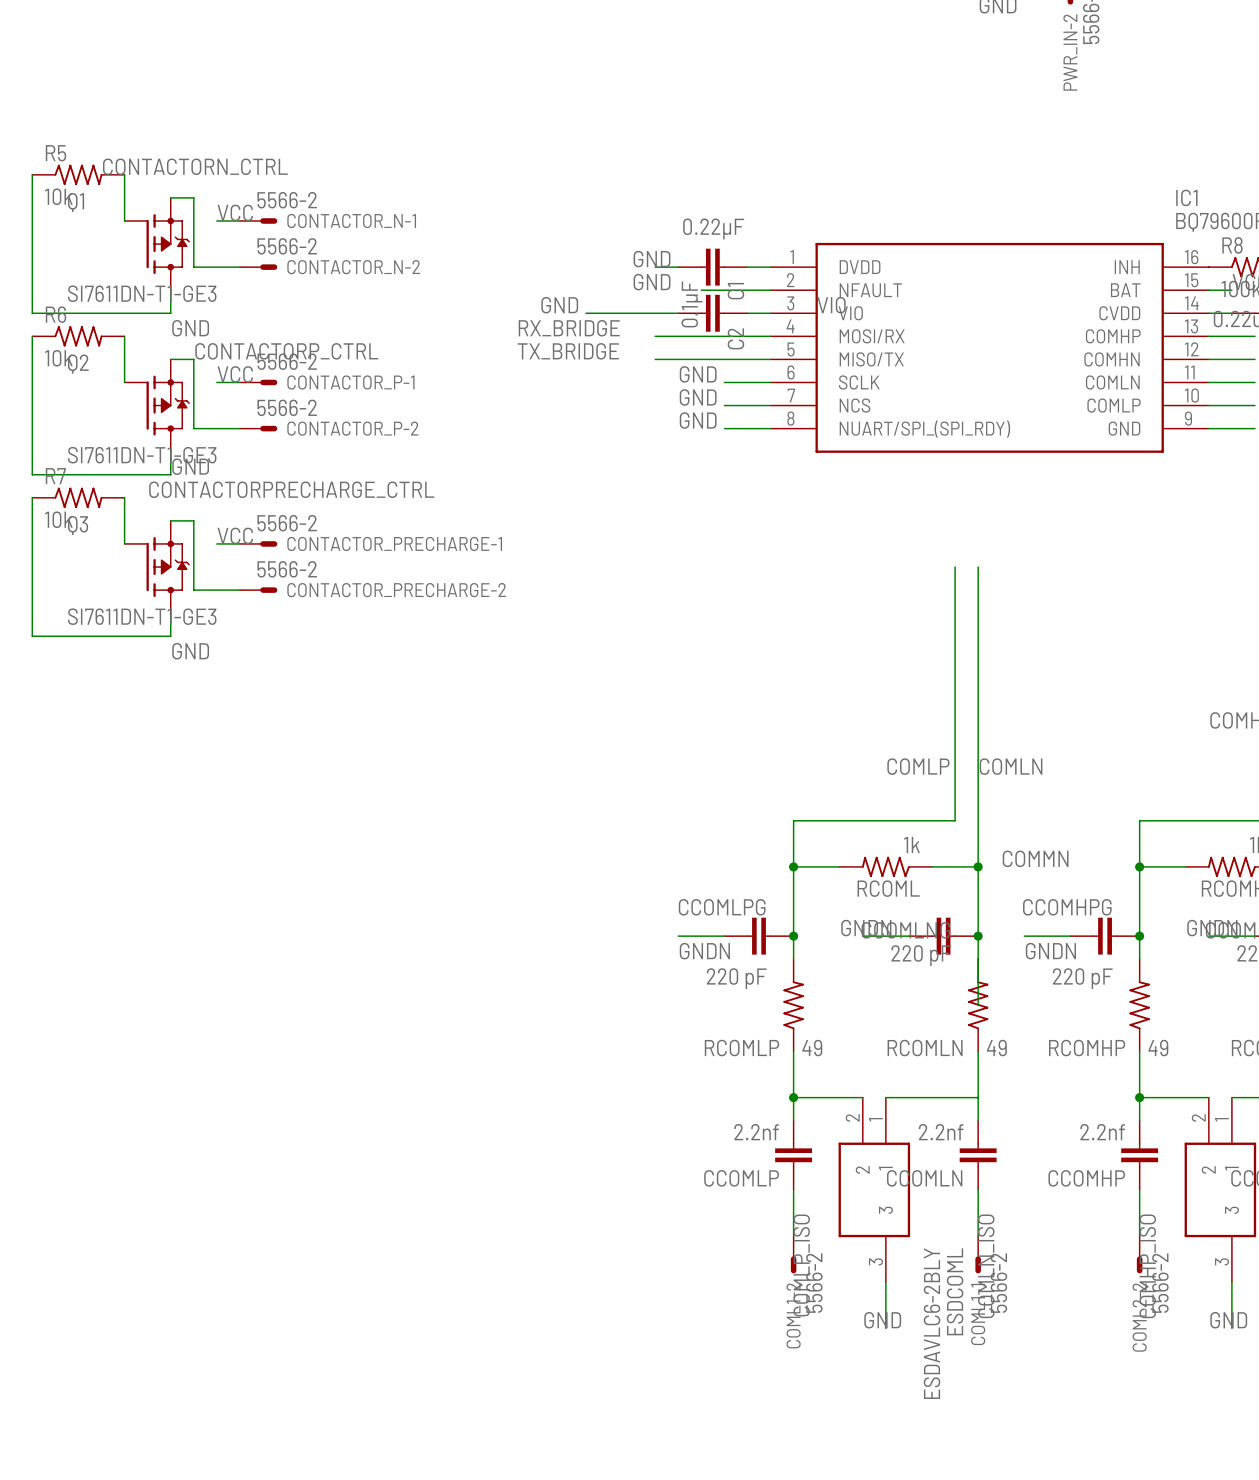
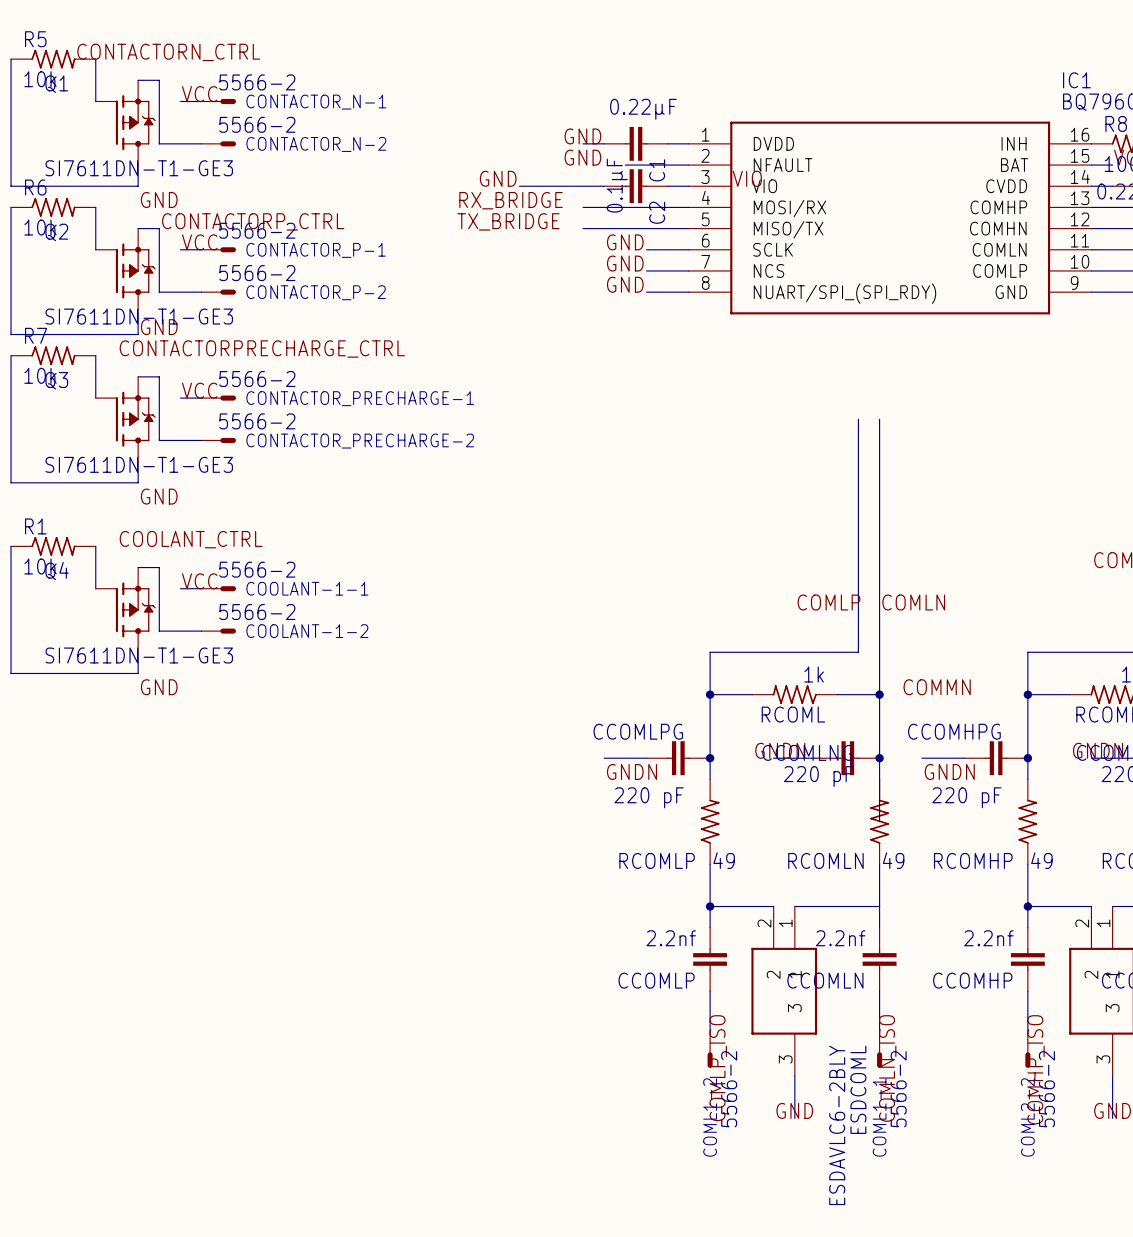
label: none -> COOLANT_CTRL (191, 539)
wire: none -> (11, 546) (11, 673) (138, 673) (138, 652)
R1: none -> 10k (53, 546)
wire: none -> (95, 546) (95, 588)
wire: none -> (138, 567) (159, 567) (159, 631) (201, 631)
label: none -> VCC (199, 581)
wire: none -> (180, 588) (201, 588)
COOLANT-1-1: none -> 5566-2 (218, 588)
Q4: none -> SI7611DN-T1-GE3 (125, 609)
COOLANT-1-2: none -> 5566-2 (218, 631)
label: none -> GND (159, 687)

